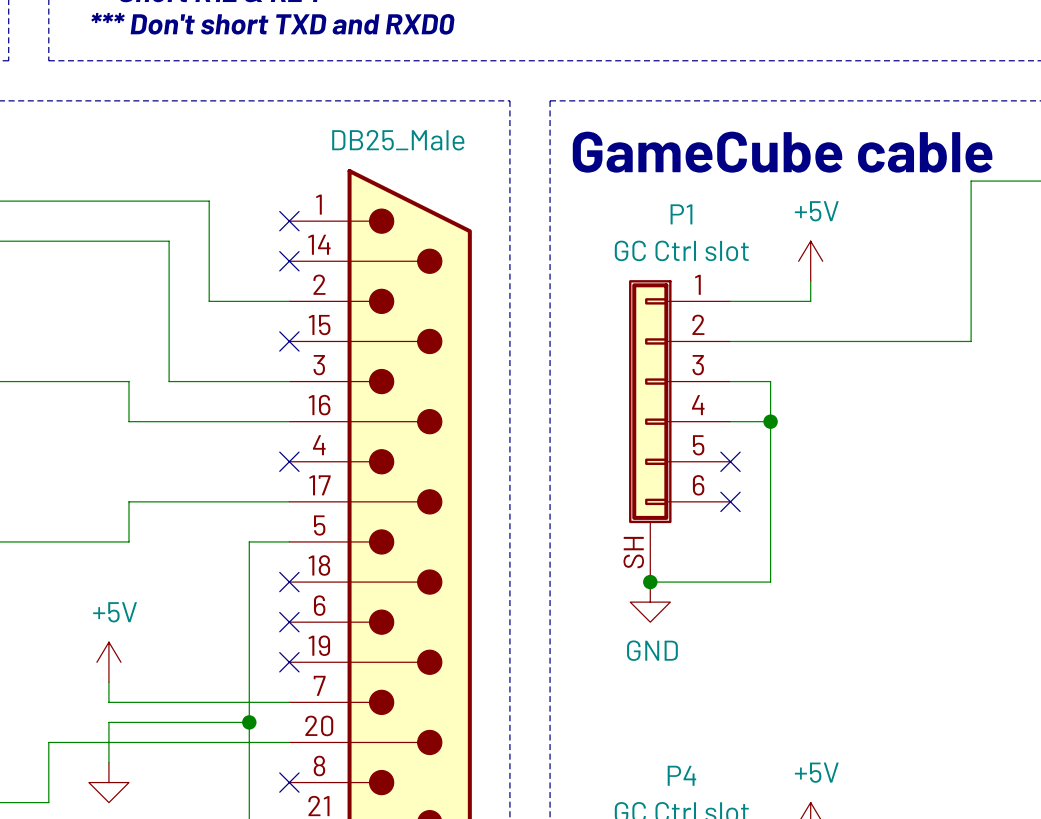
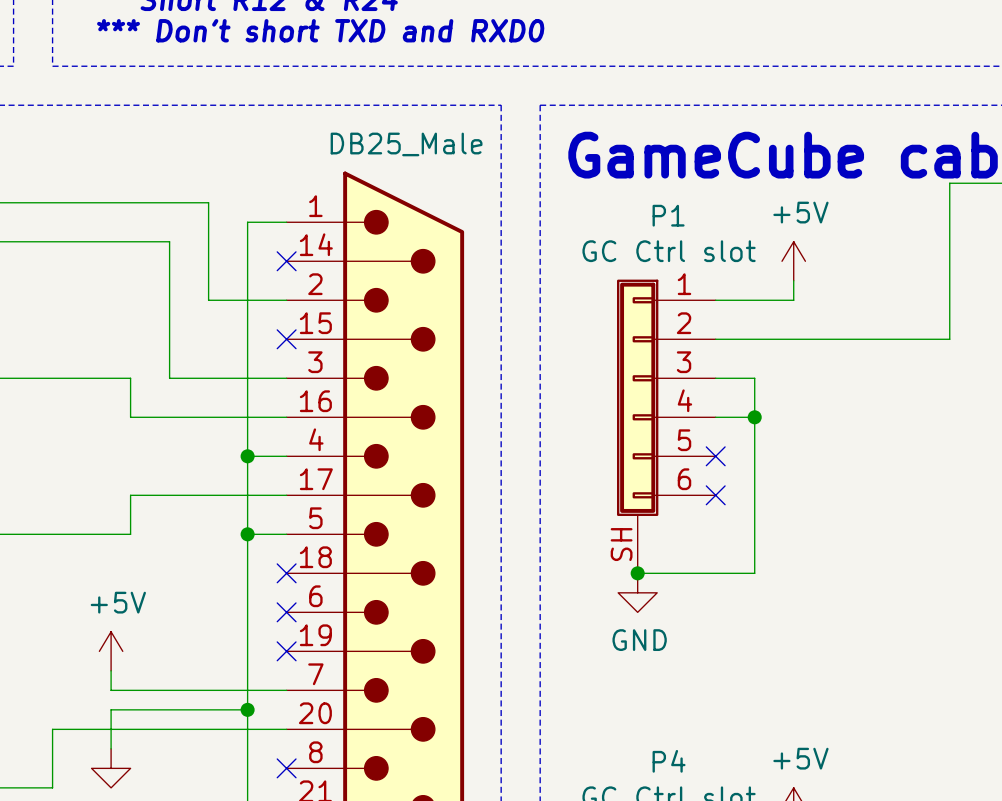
wire: none -> (286, 222) (247, 222) (247, 534)
no-connect mark: (289, 221) -> none
wire: none -> (247, 456) (286, 456)
junction: none -> (247, 456)
no-connect mark: (289, 461) -> none
junction: none -> (247, 534)

